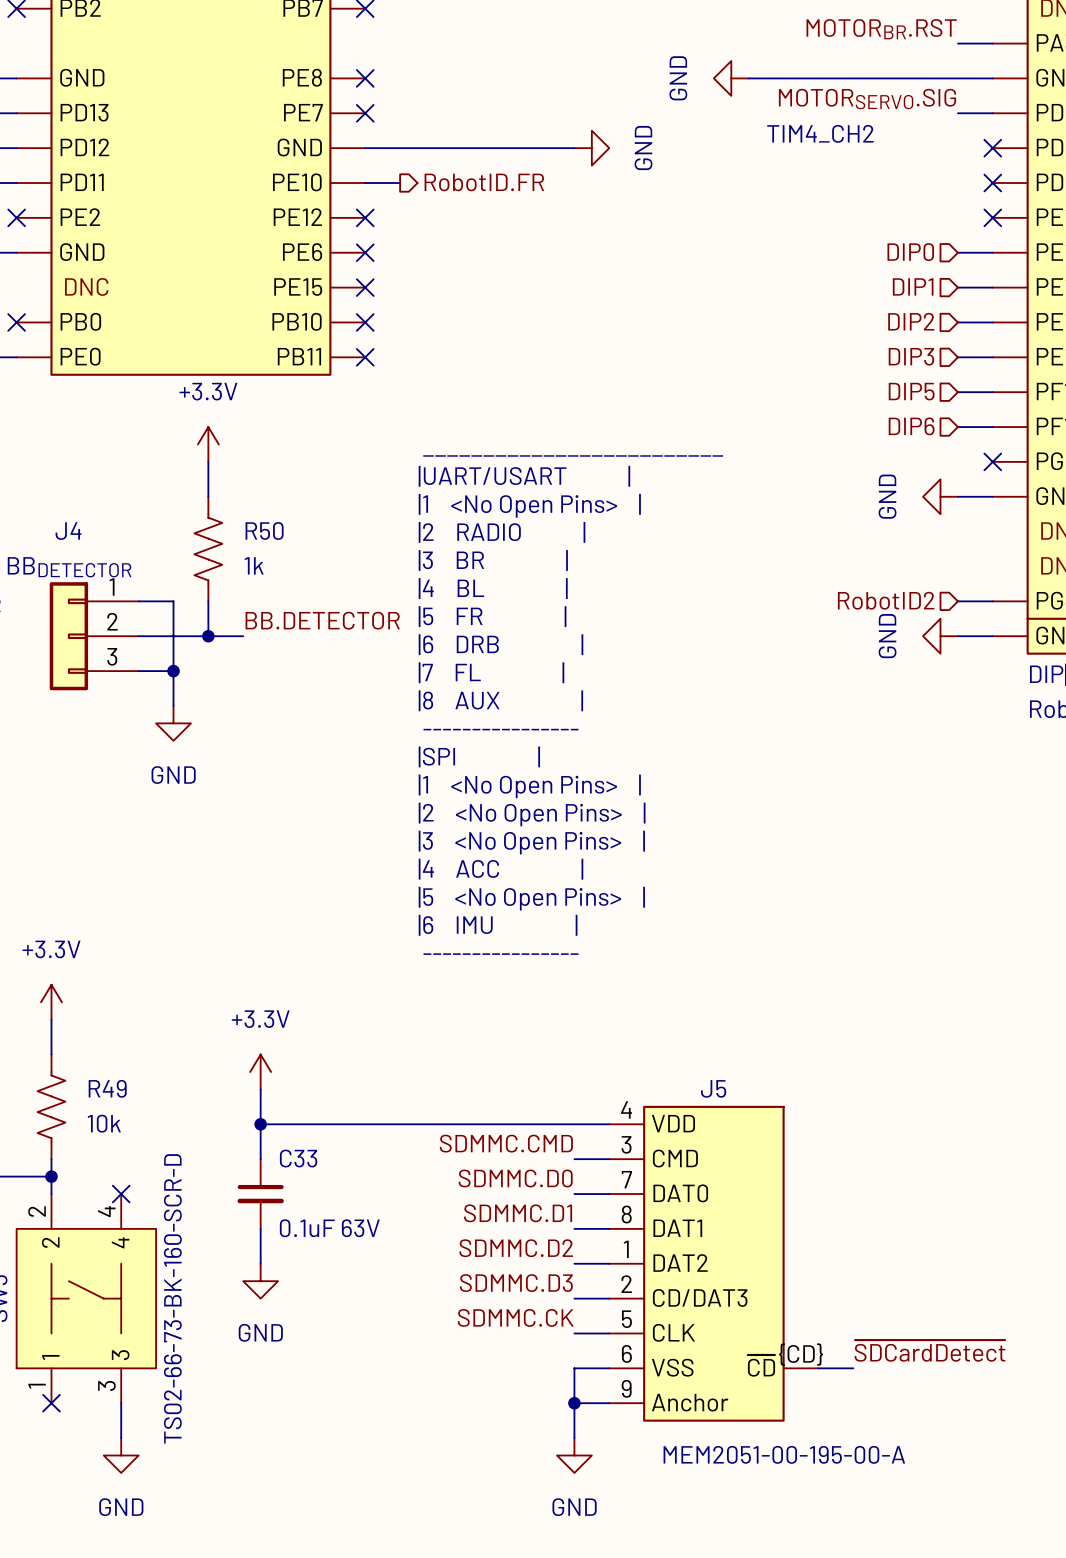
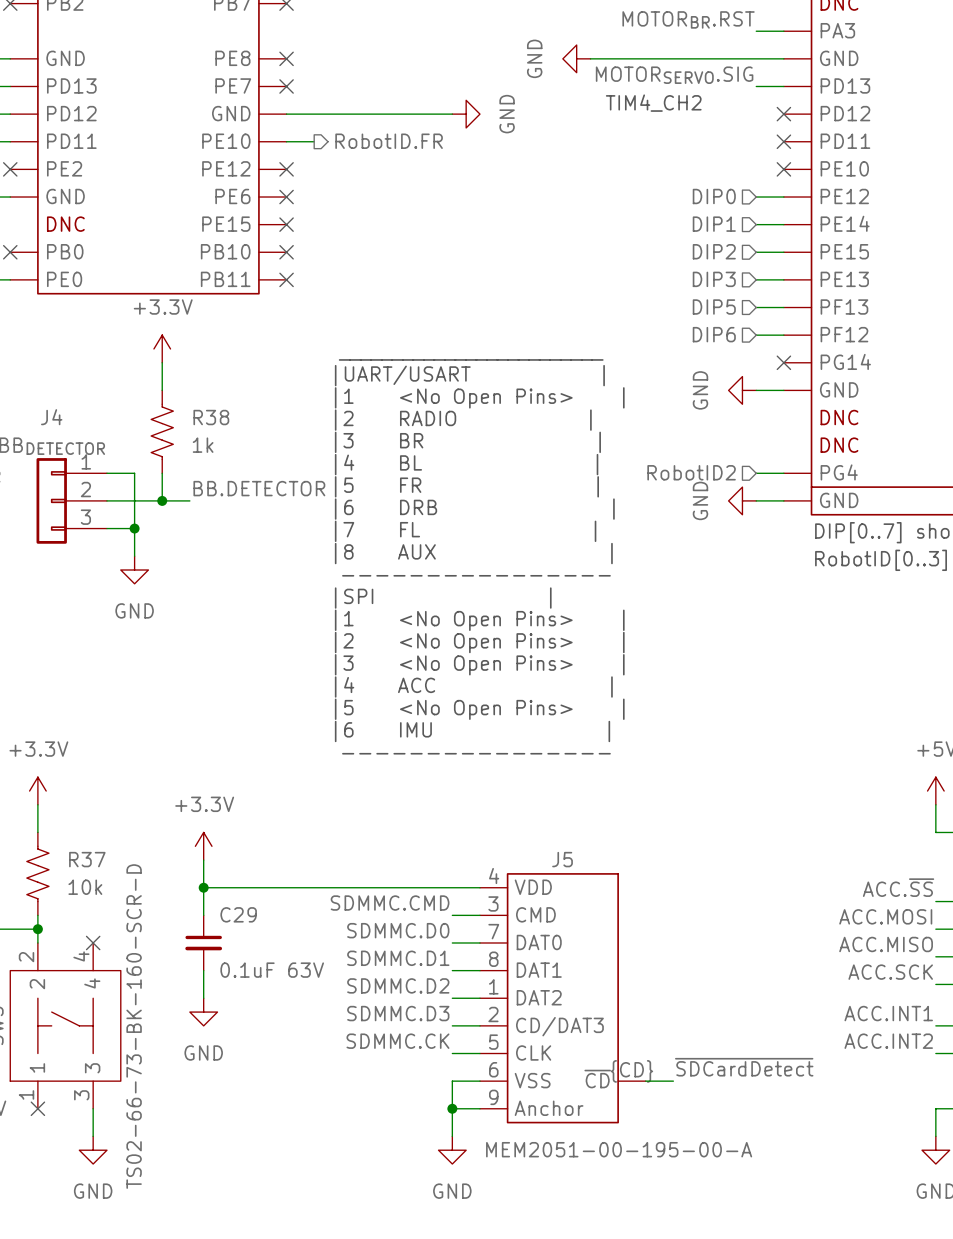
R50 name: R50 (264, 530) -> R38 (211, 417)
R49 name: R49 (107, 1088) -> R37 (87, 859)
C33 name: C33 (298, 1158) -> C29 (238, 914)

